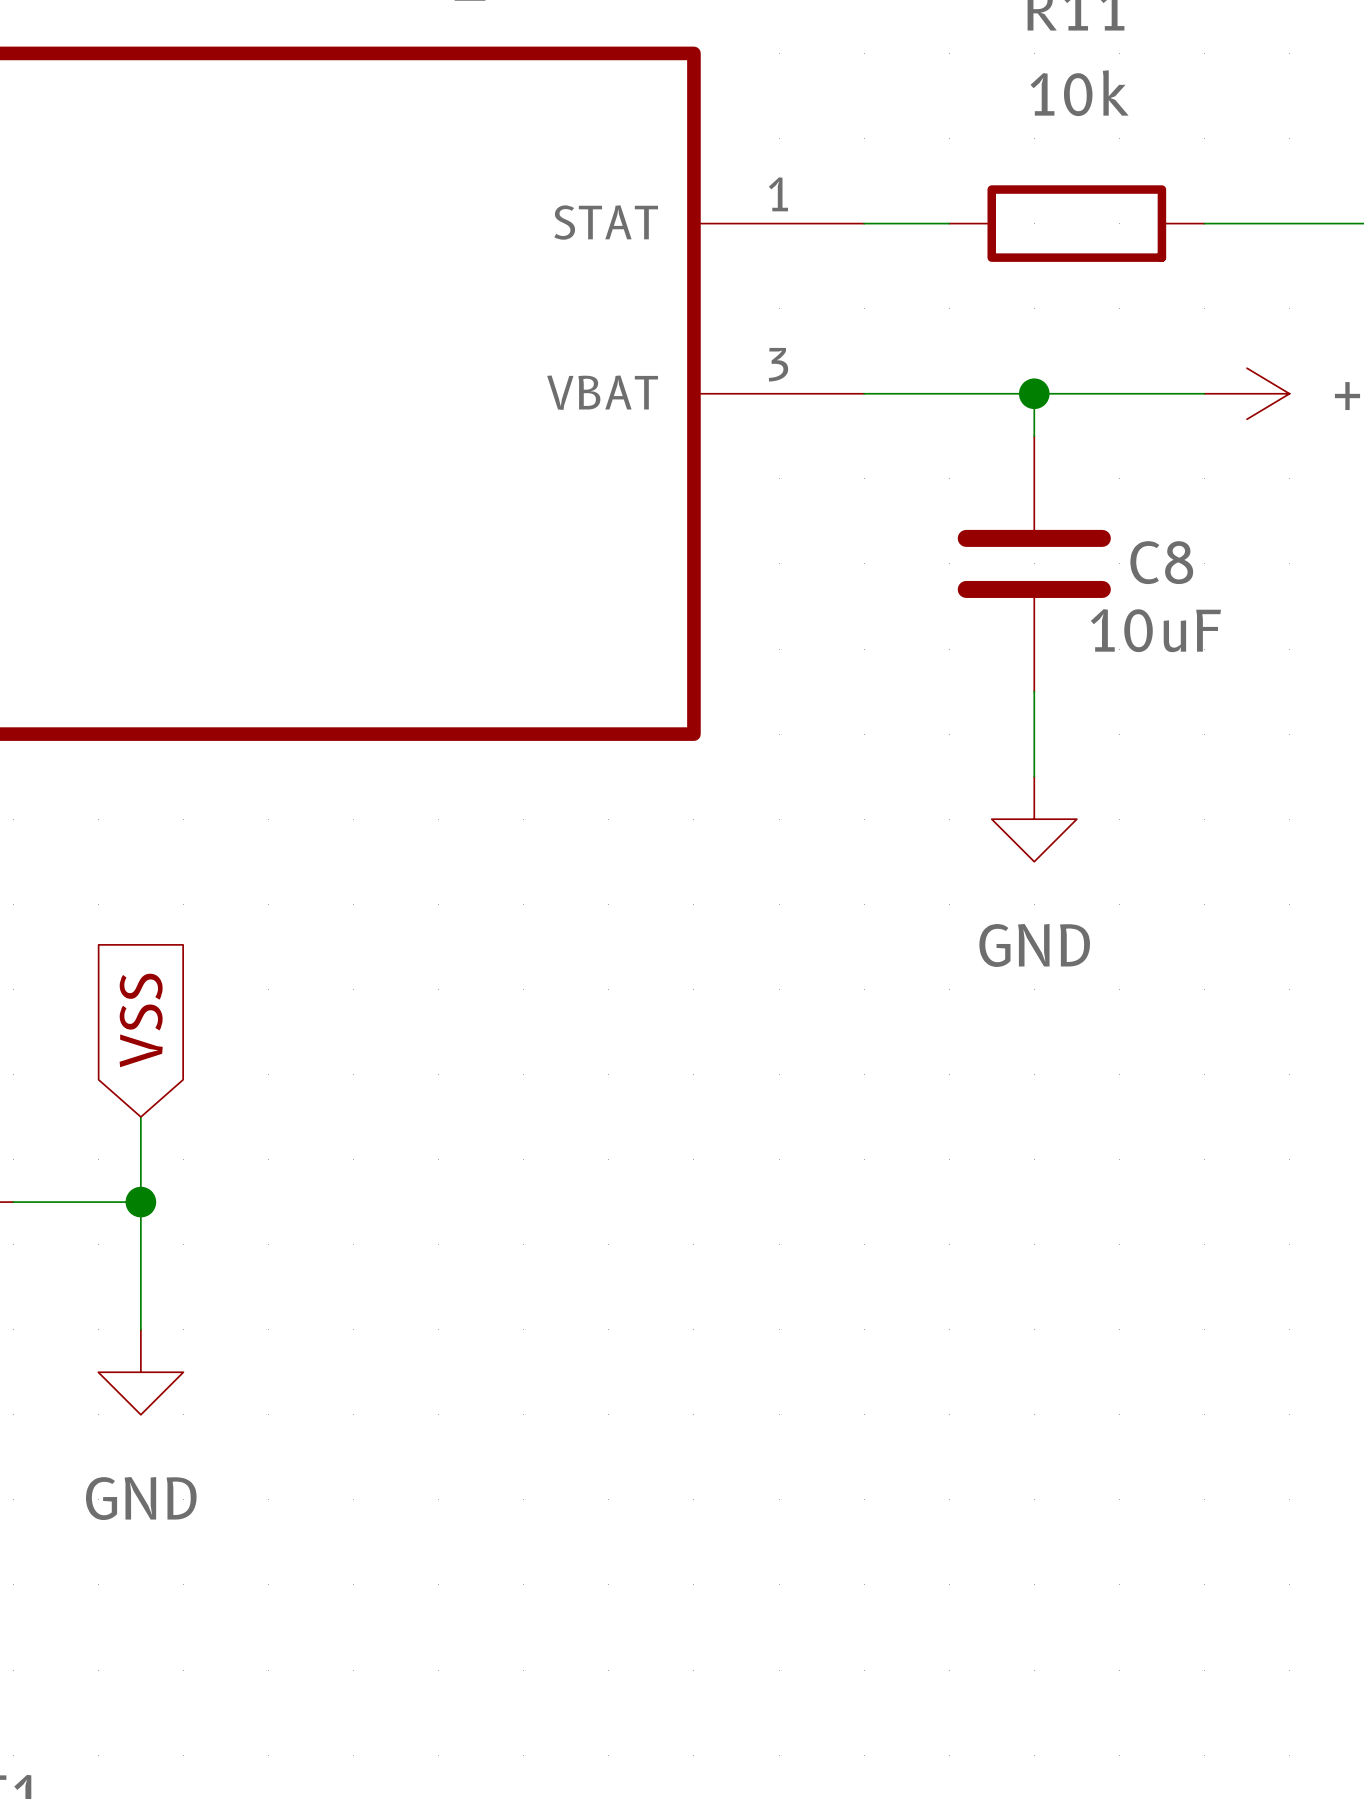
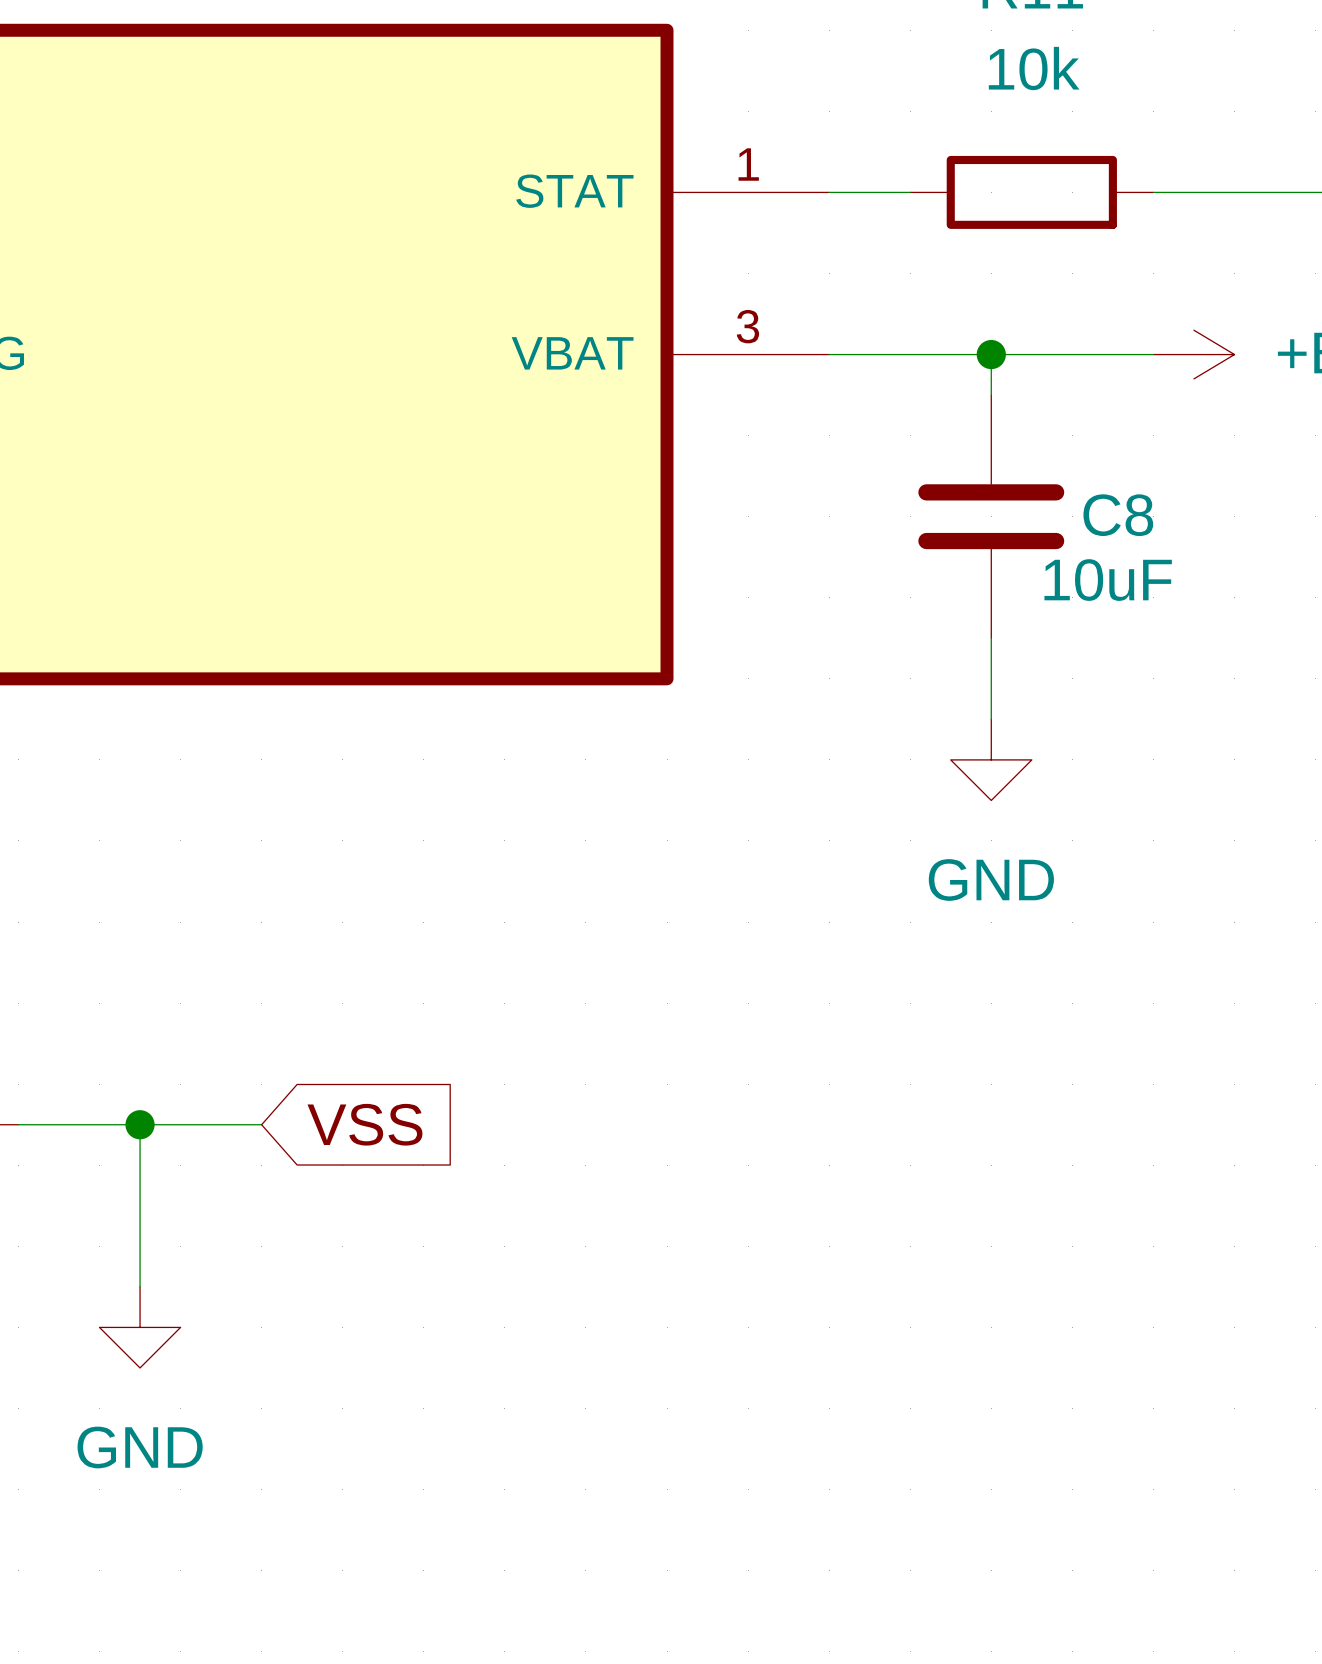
global label rotation: 0° (141, 1020) -> 90° clockwise (364, 1124)
global label position: VSS (141, 1020) -> VSS (364, 1124)
wire: (140, 1116) (140, 1202) -> (261, 1124) (140, 1124)
power symbol position: GND (140, 1372) -> GND (140, 1327)

